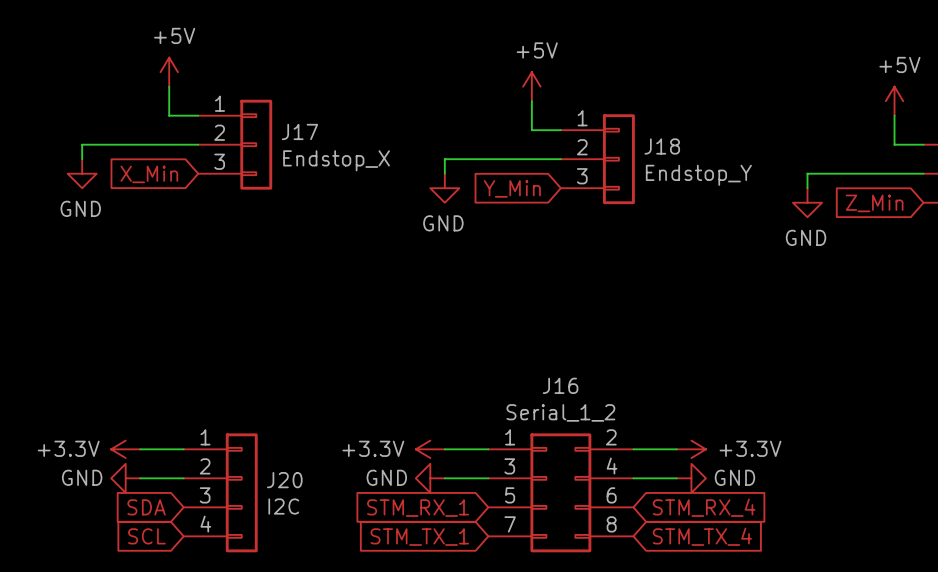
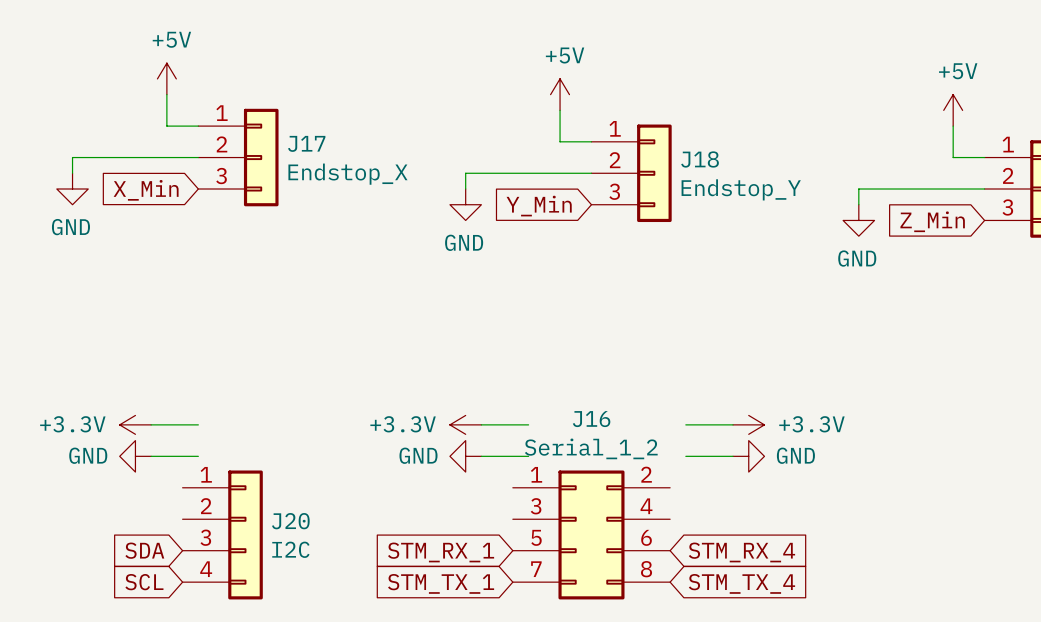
power symbol position: +3.3V (125, 449) -> +3.3V (135, 424)
wire: (140, 449) (183, 449) -> (151, 424) (198, 424)
power symbol position: +3.3V (430, 449) -> +3.3V (465, 424)
wire: (444, 449) (488, 449) -> (481, 424) (528, 424)
wire: (633, 449) (676, 449) -> (685, 424) (733, 424)
power symbol position: +3.3V (691, 449) -> +3.3V (748, 424)
power symbol position: GND (125, 478) -> GND (135, 456)
wire: (140, 478) (183, 478) -> (151, 456) (198, 456)
power symbol position: GND (430, 478) -> GND (465, 456)
wire: (444, 478) (488, 478) -> (481, 456) (528, 456)
wire: (633, 478) (676, 478) -> (685, 456) (733, 456)
power symbol position: GND (691, 478) -> GND (748, 456)

